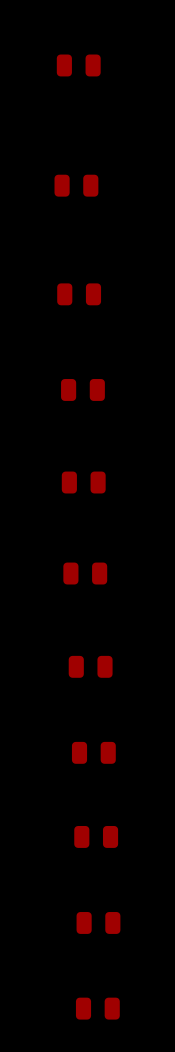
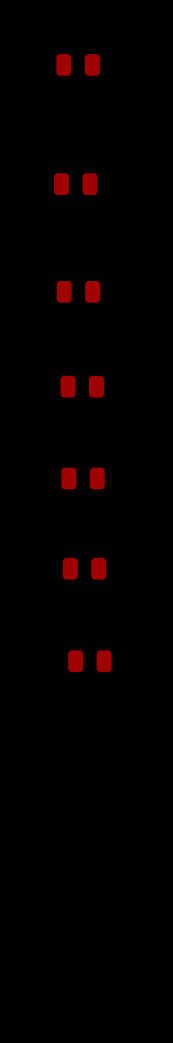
part: (93, 752) -> none
part: (96, 836) -> none
part: (98, 922) -> none
part: (97, 1008) -> none

